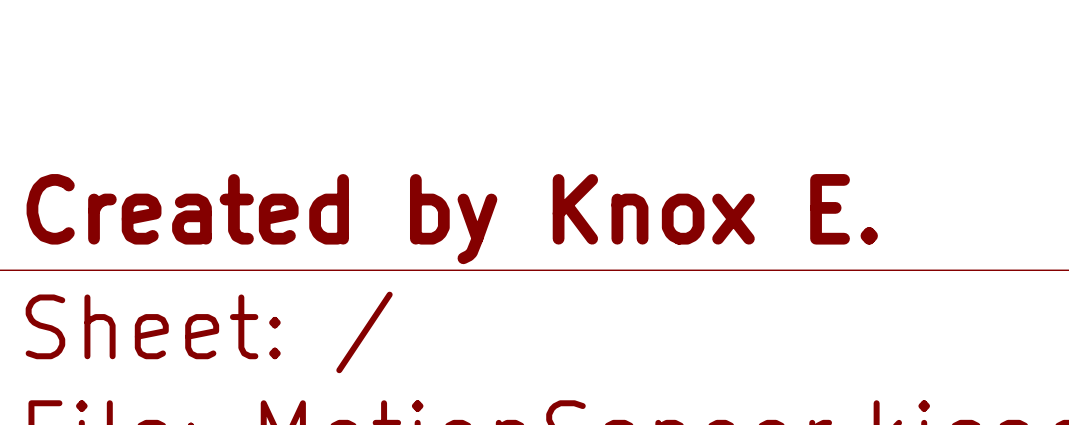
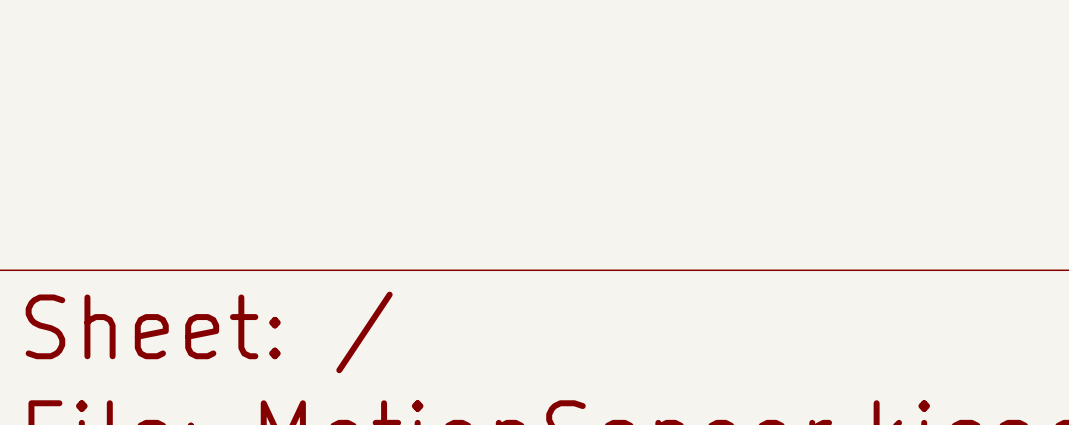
title block: Created by Knox E. (452, 219) -> none

